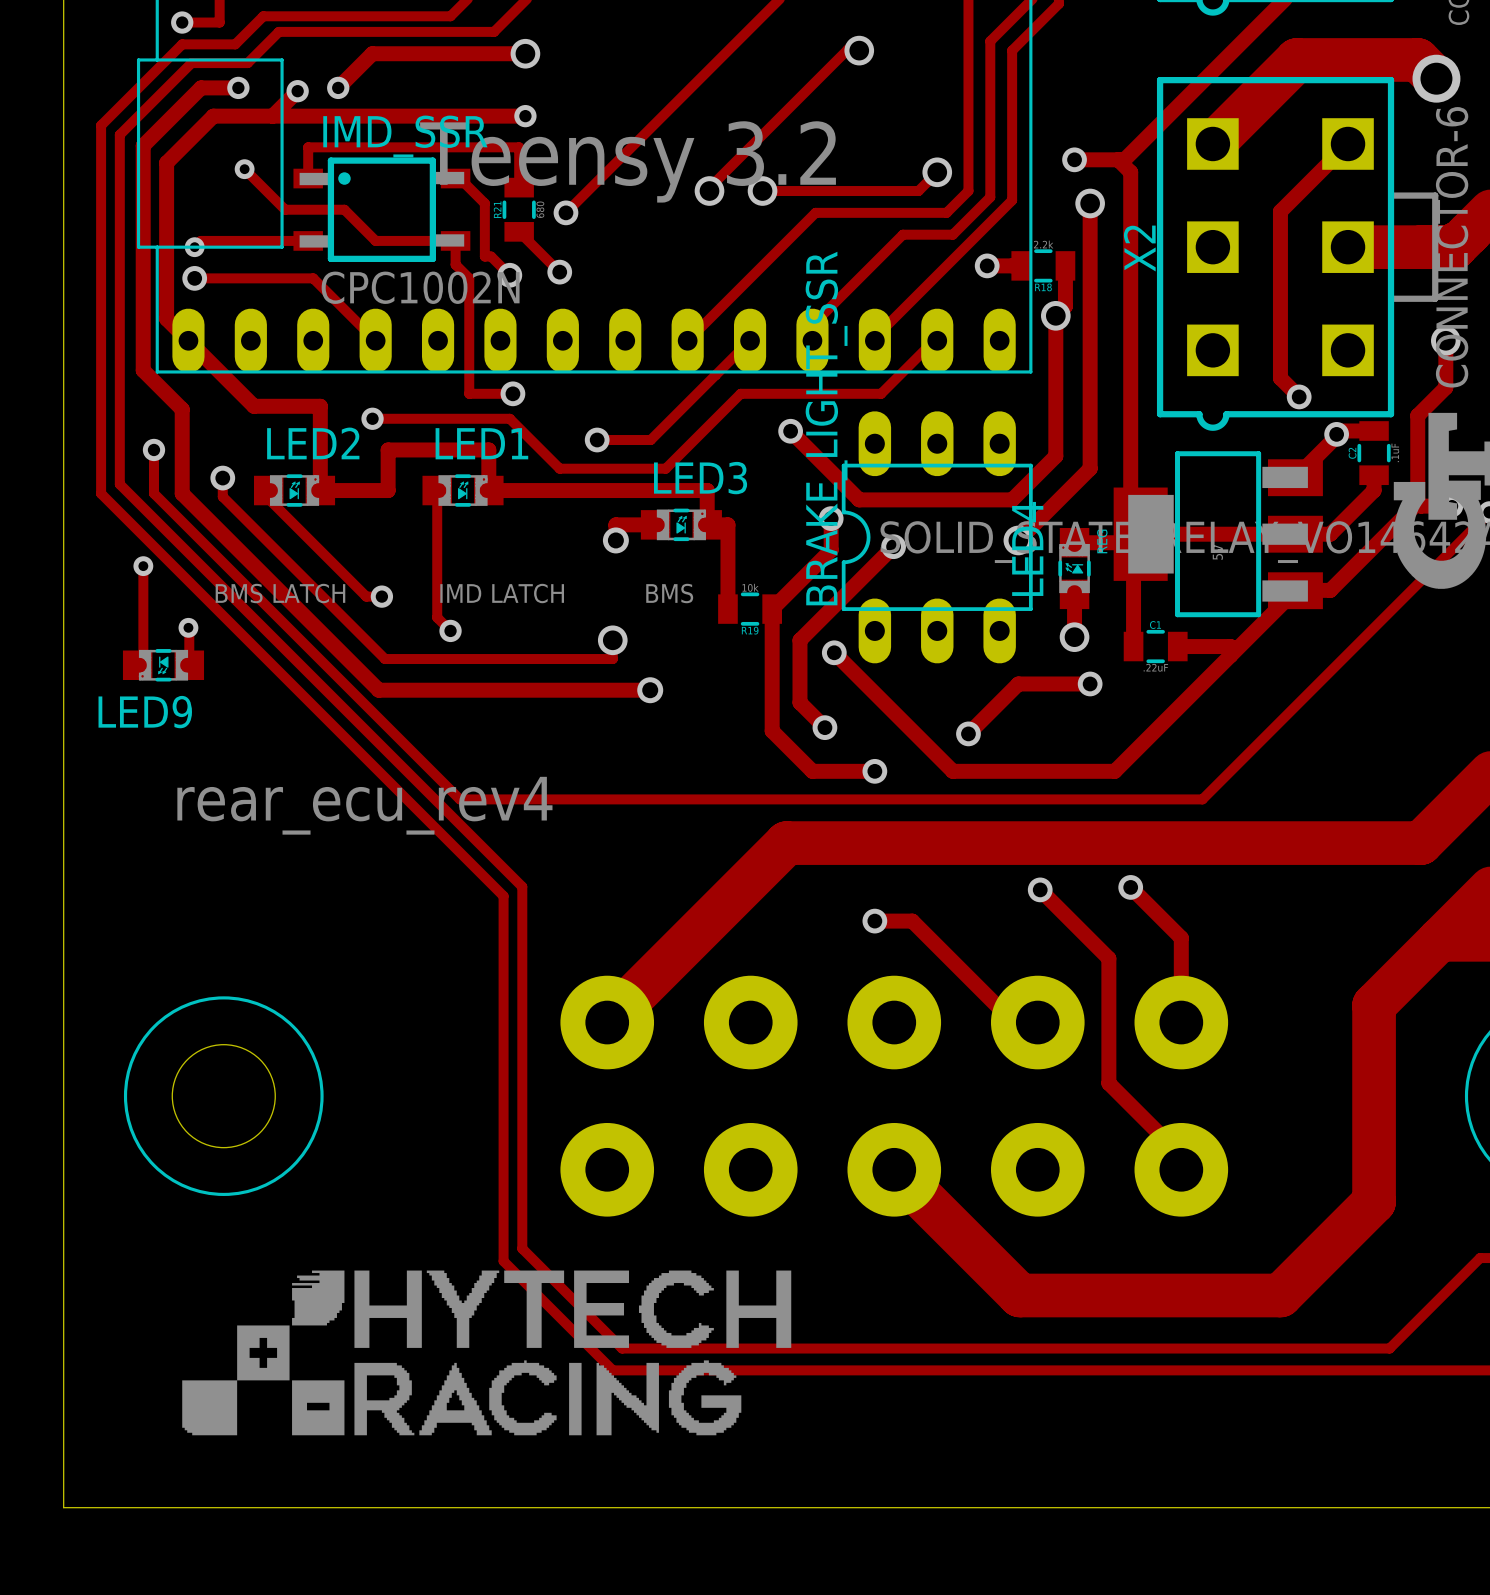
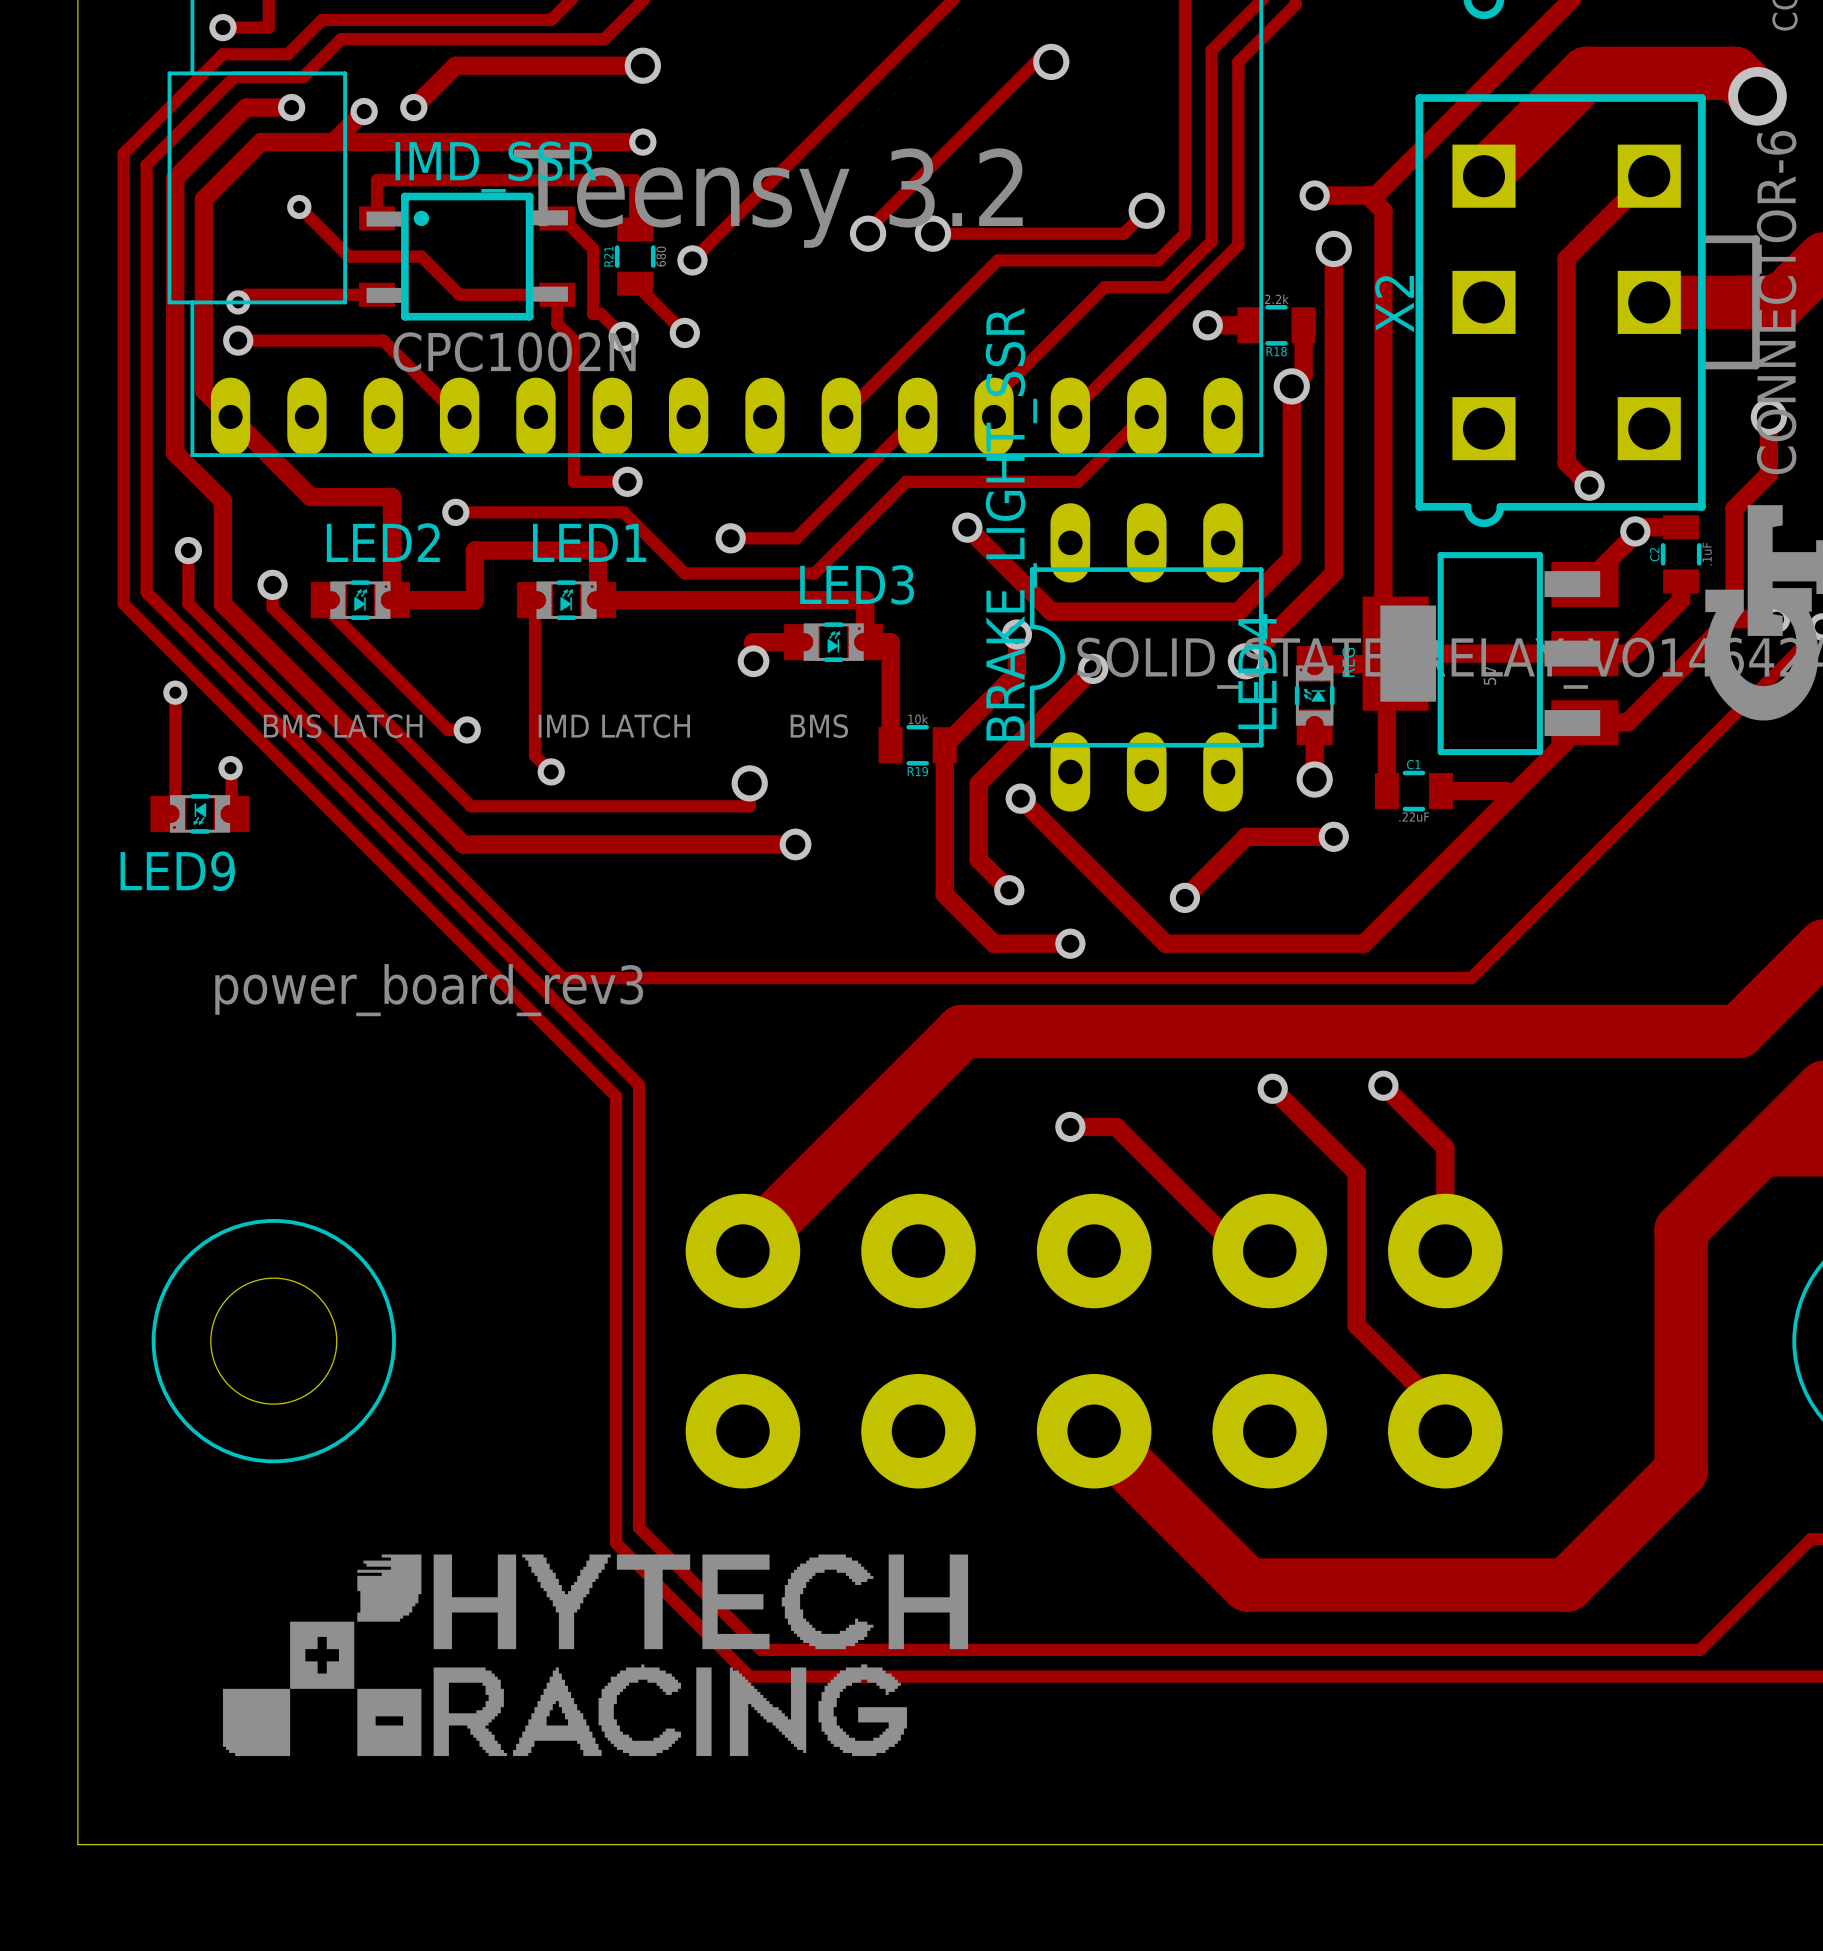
text: rear_ecu_rev4 (364, 805) -> power_board_rev3 (429, 990)

